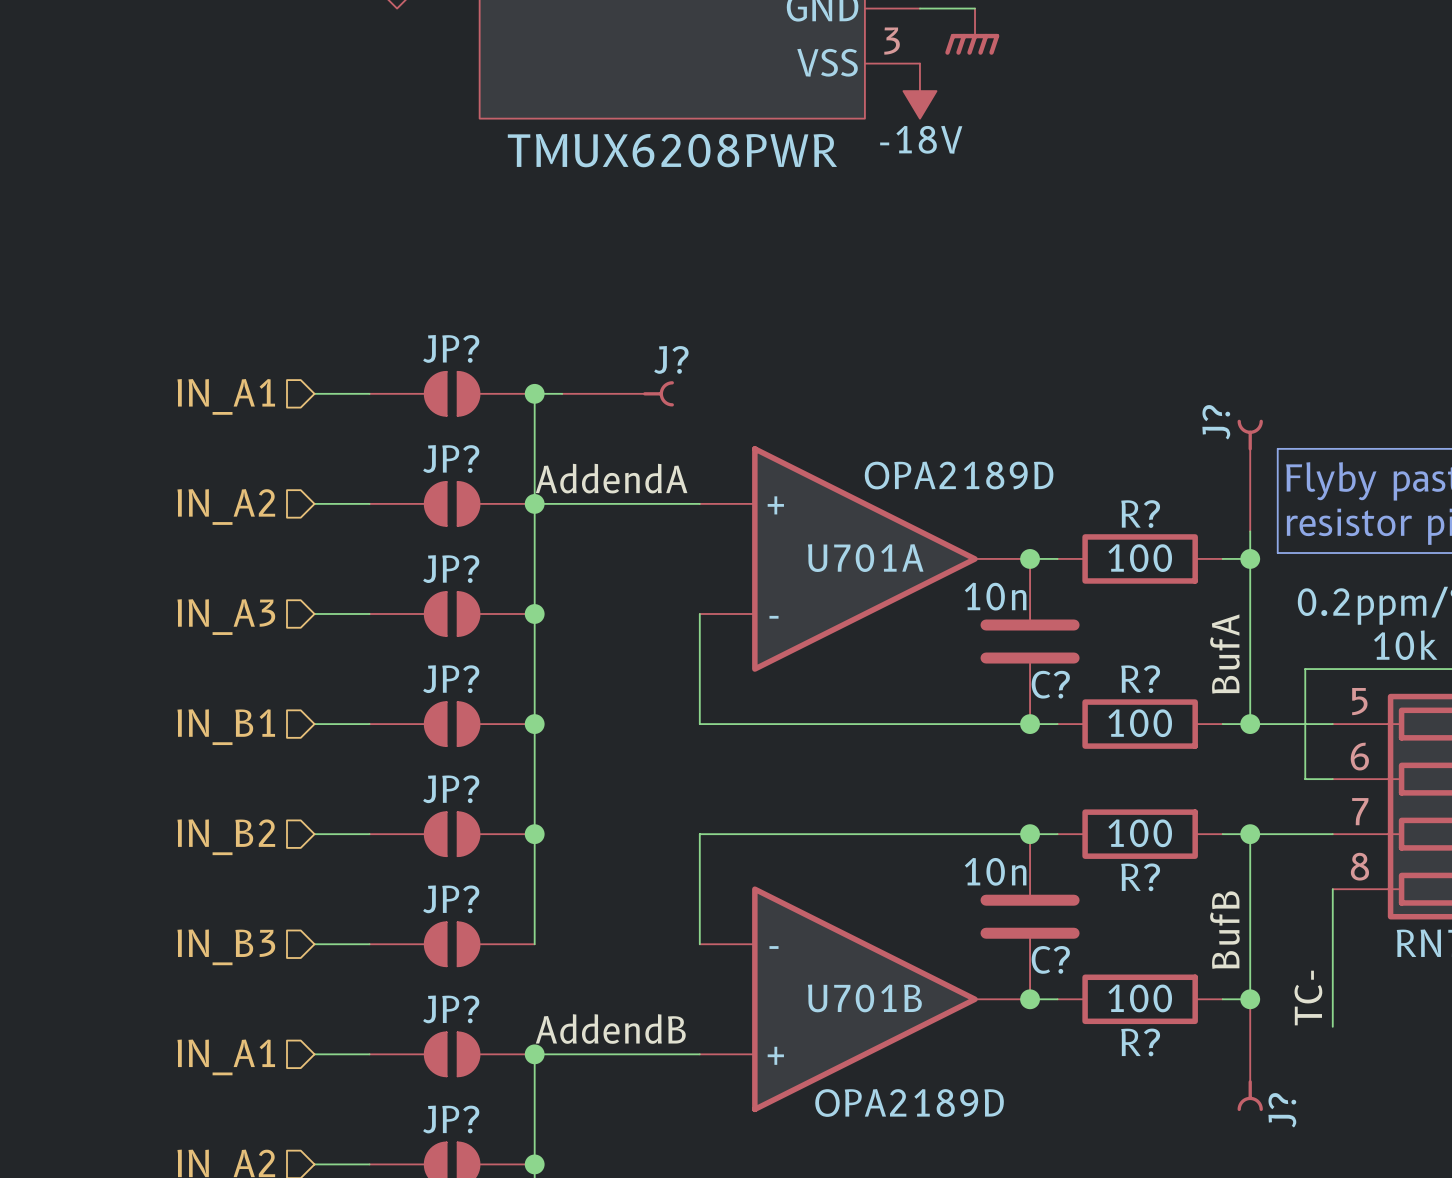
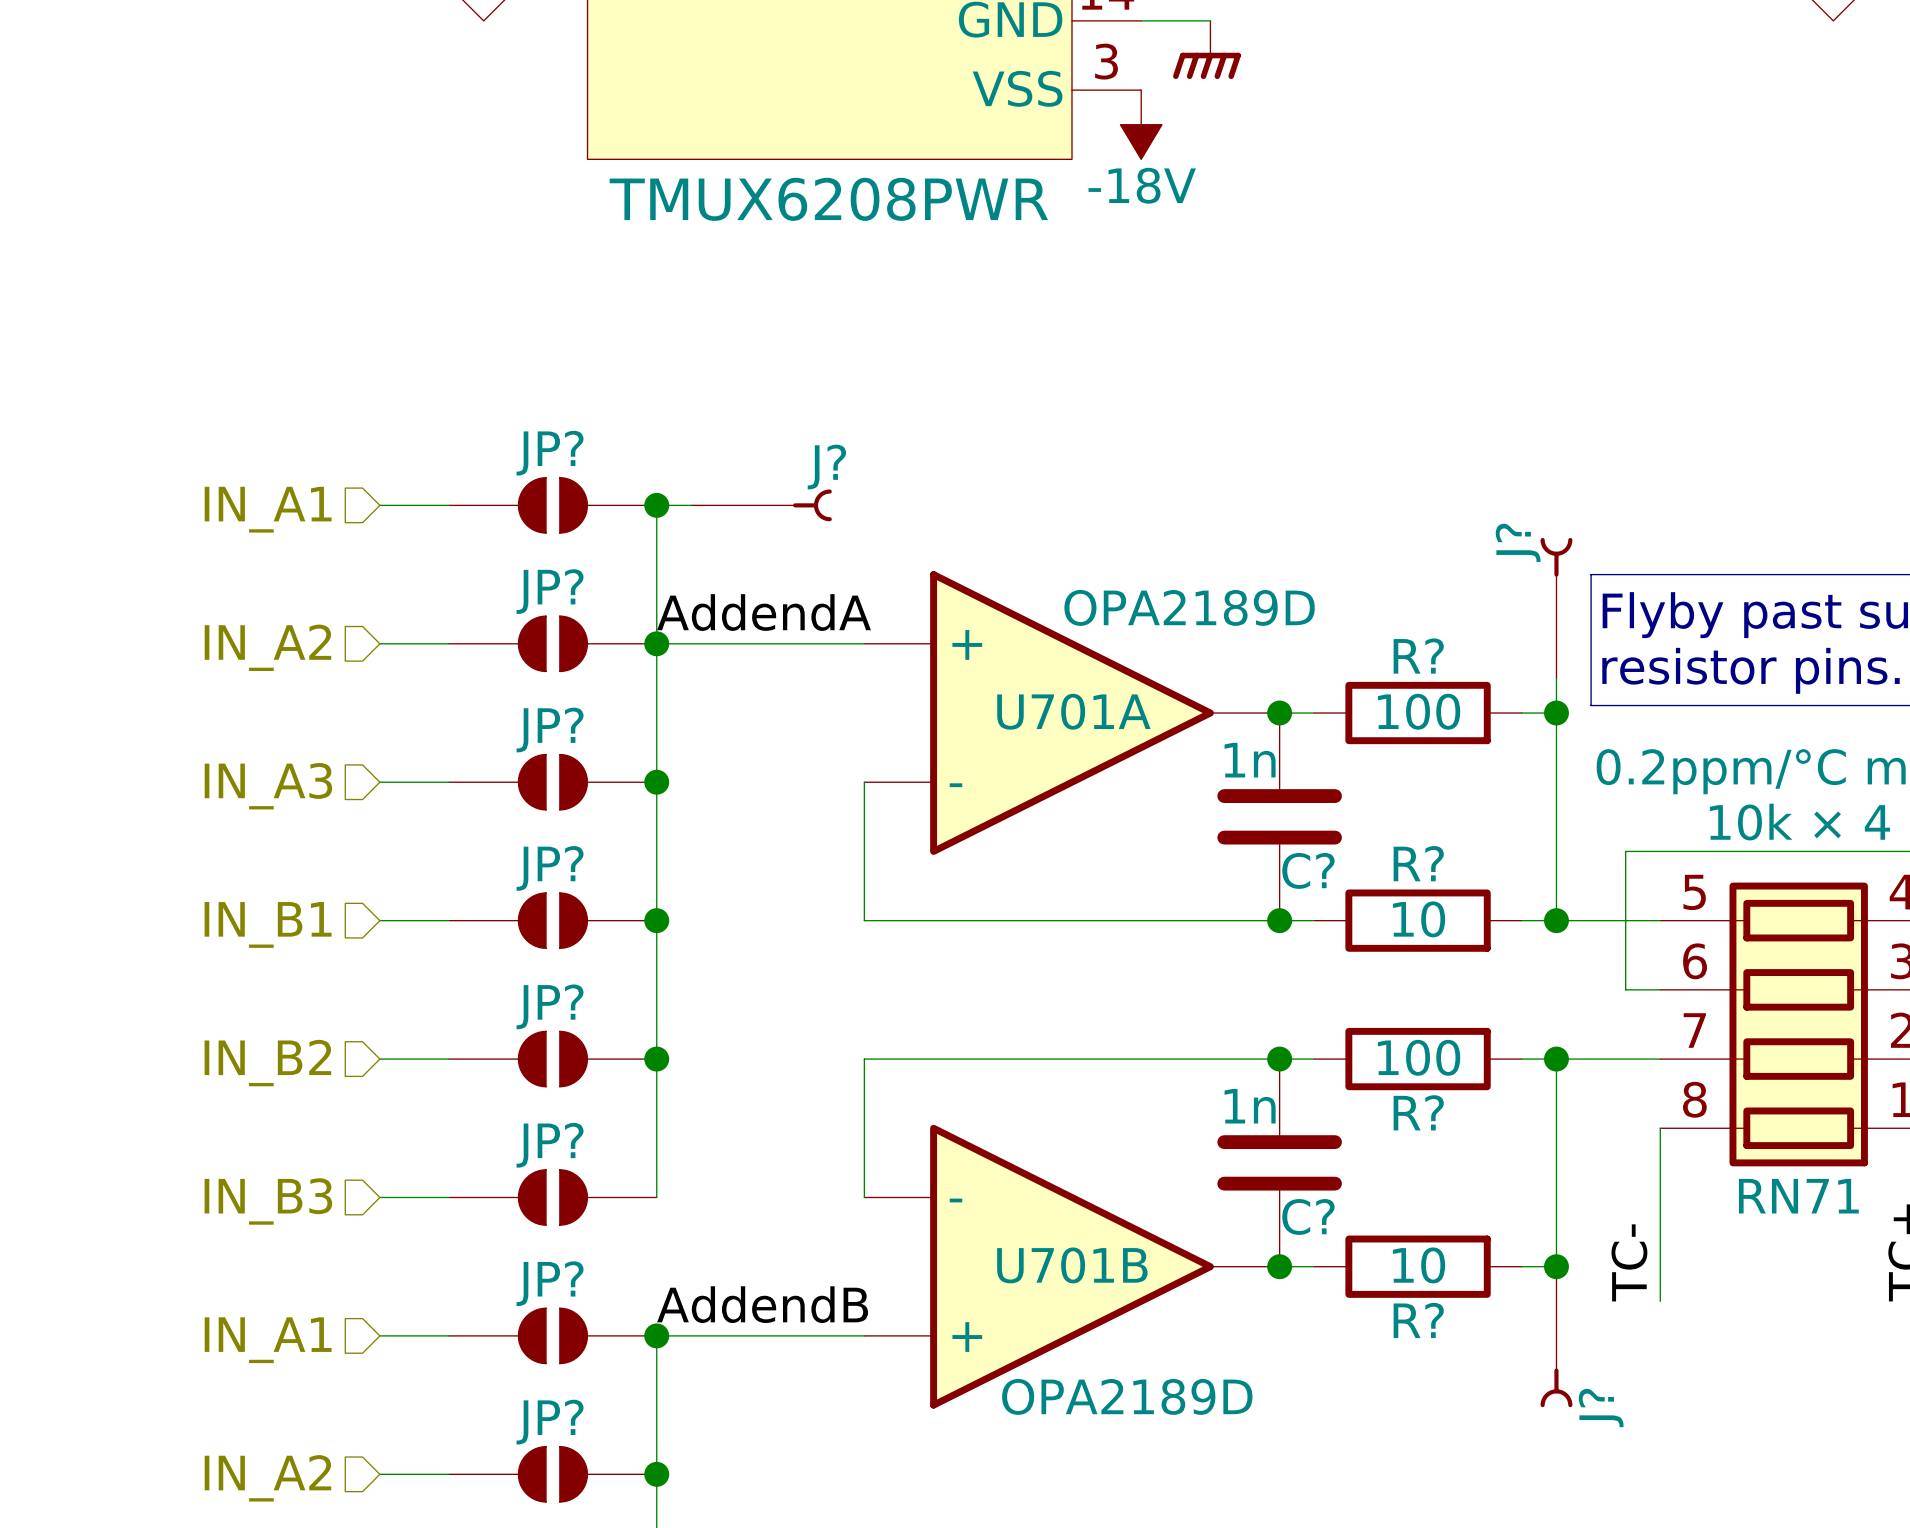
C? value: 10n (995, 596) -> 1n (1250, 760)
label: BufA (1224, 654) -> none
R? value: 100 (1140, 723) -> 10 (1419, 919)
C? value: 10n (995, 871) -> 1n (1250, 1106)
label: BufB (1224, 930) -> none
R? value: 100 (1140, 998) -> 10 (1419, 1265)

